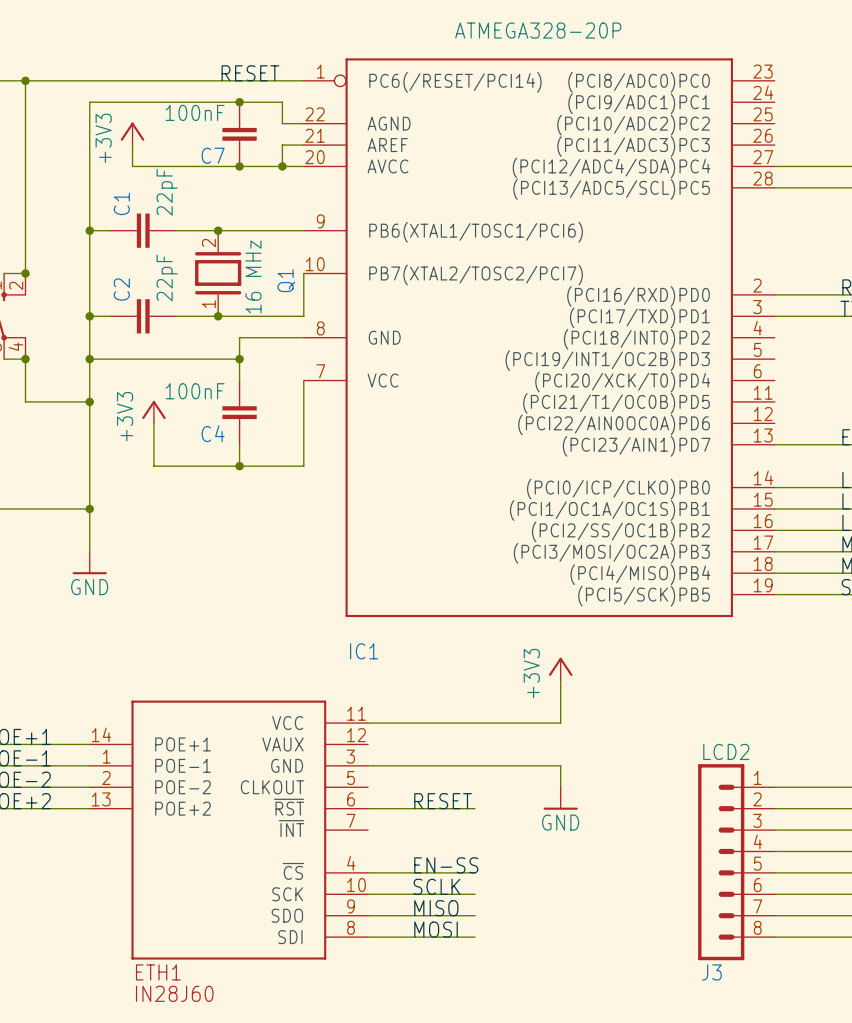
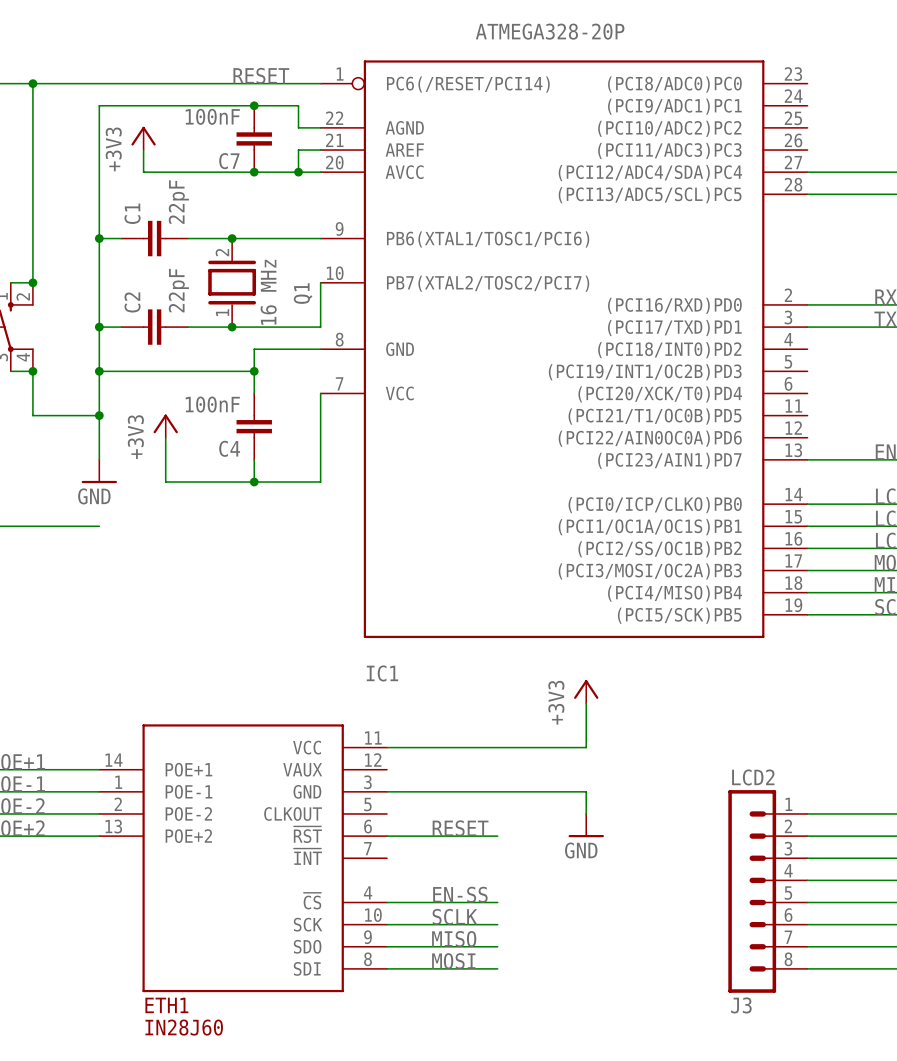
wire: (89, 444) (89, 551) -> none
junction: (89, 508) -> none
power symbol position: GND (89, 563) -> GND (99, 471)

